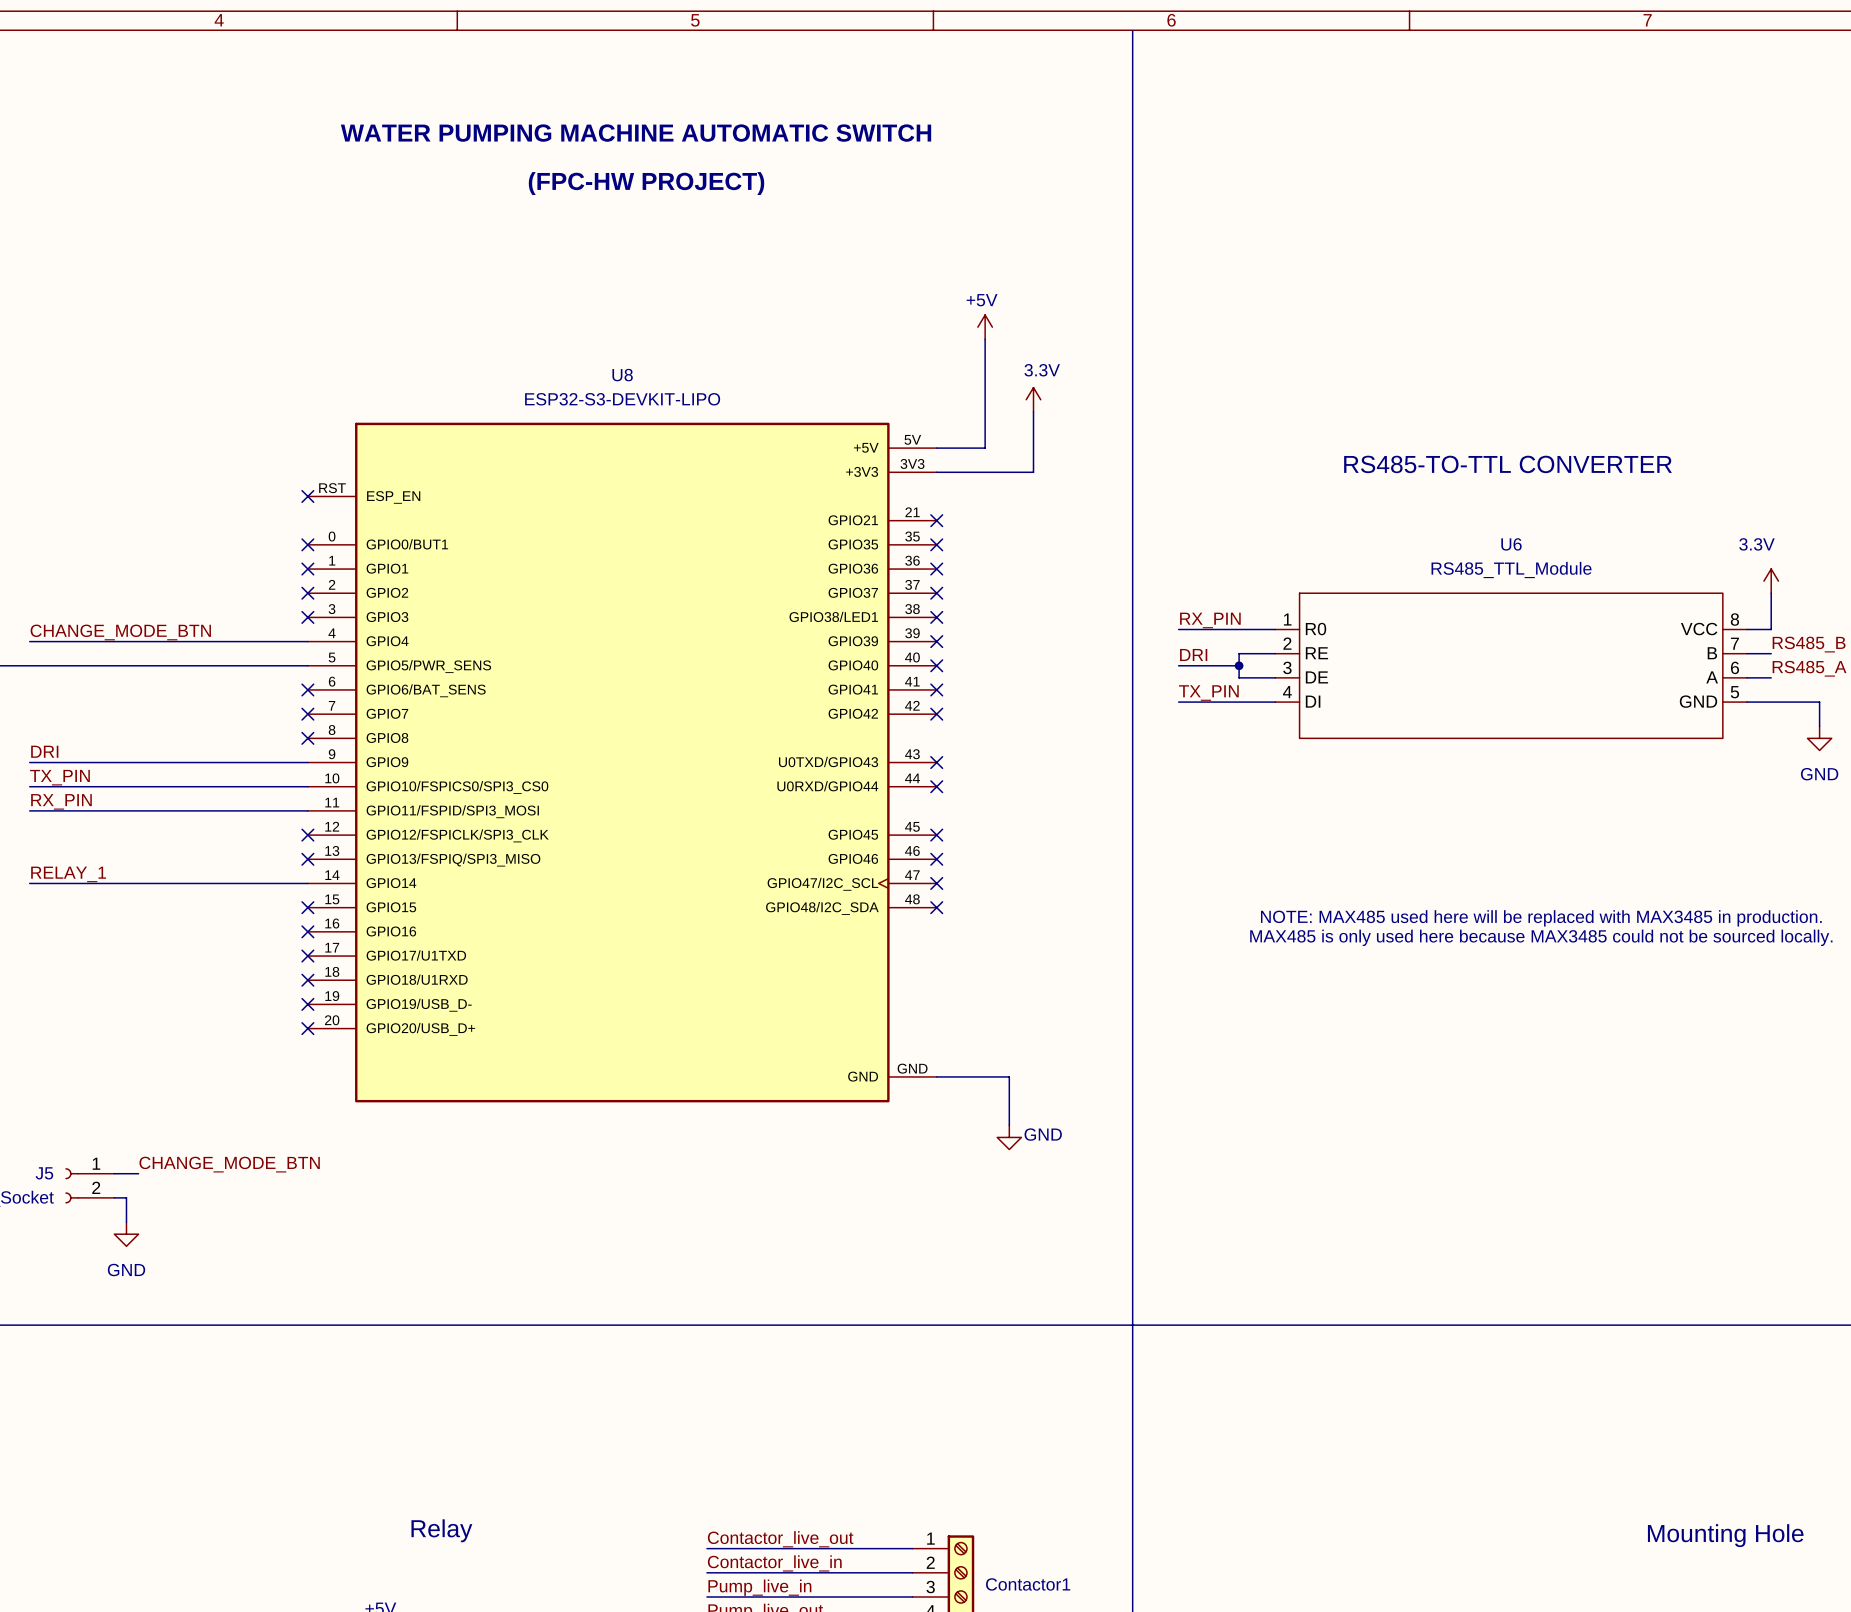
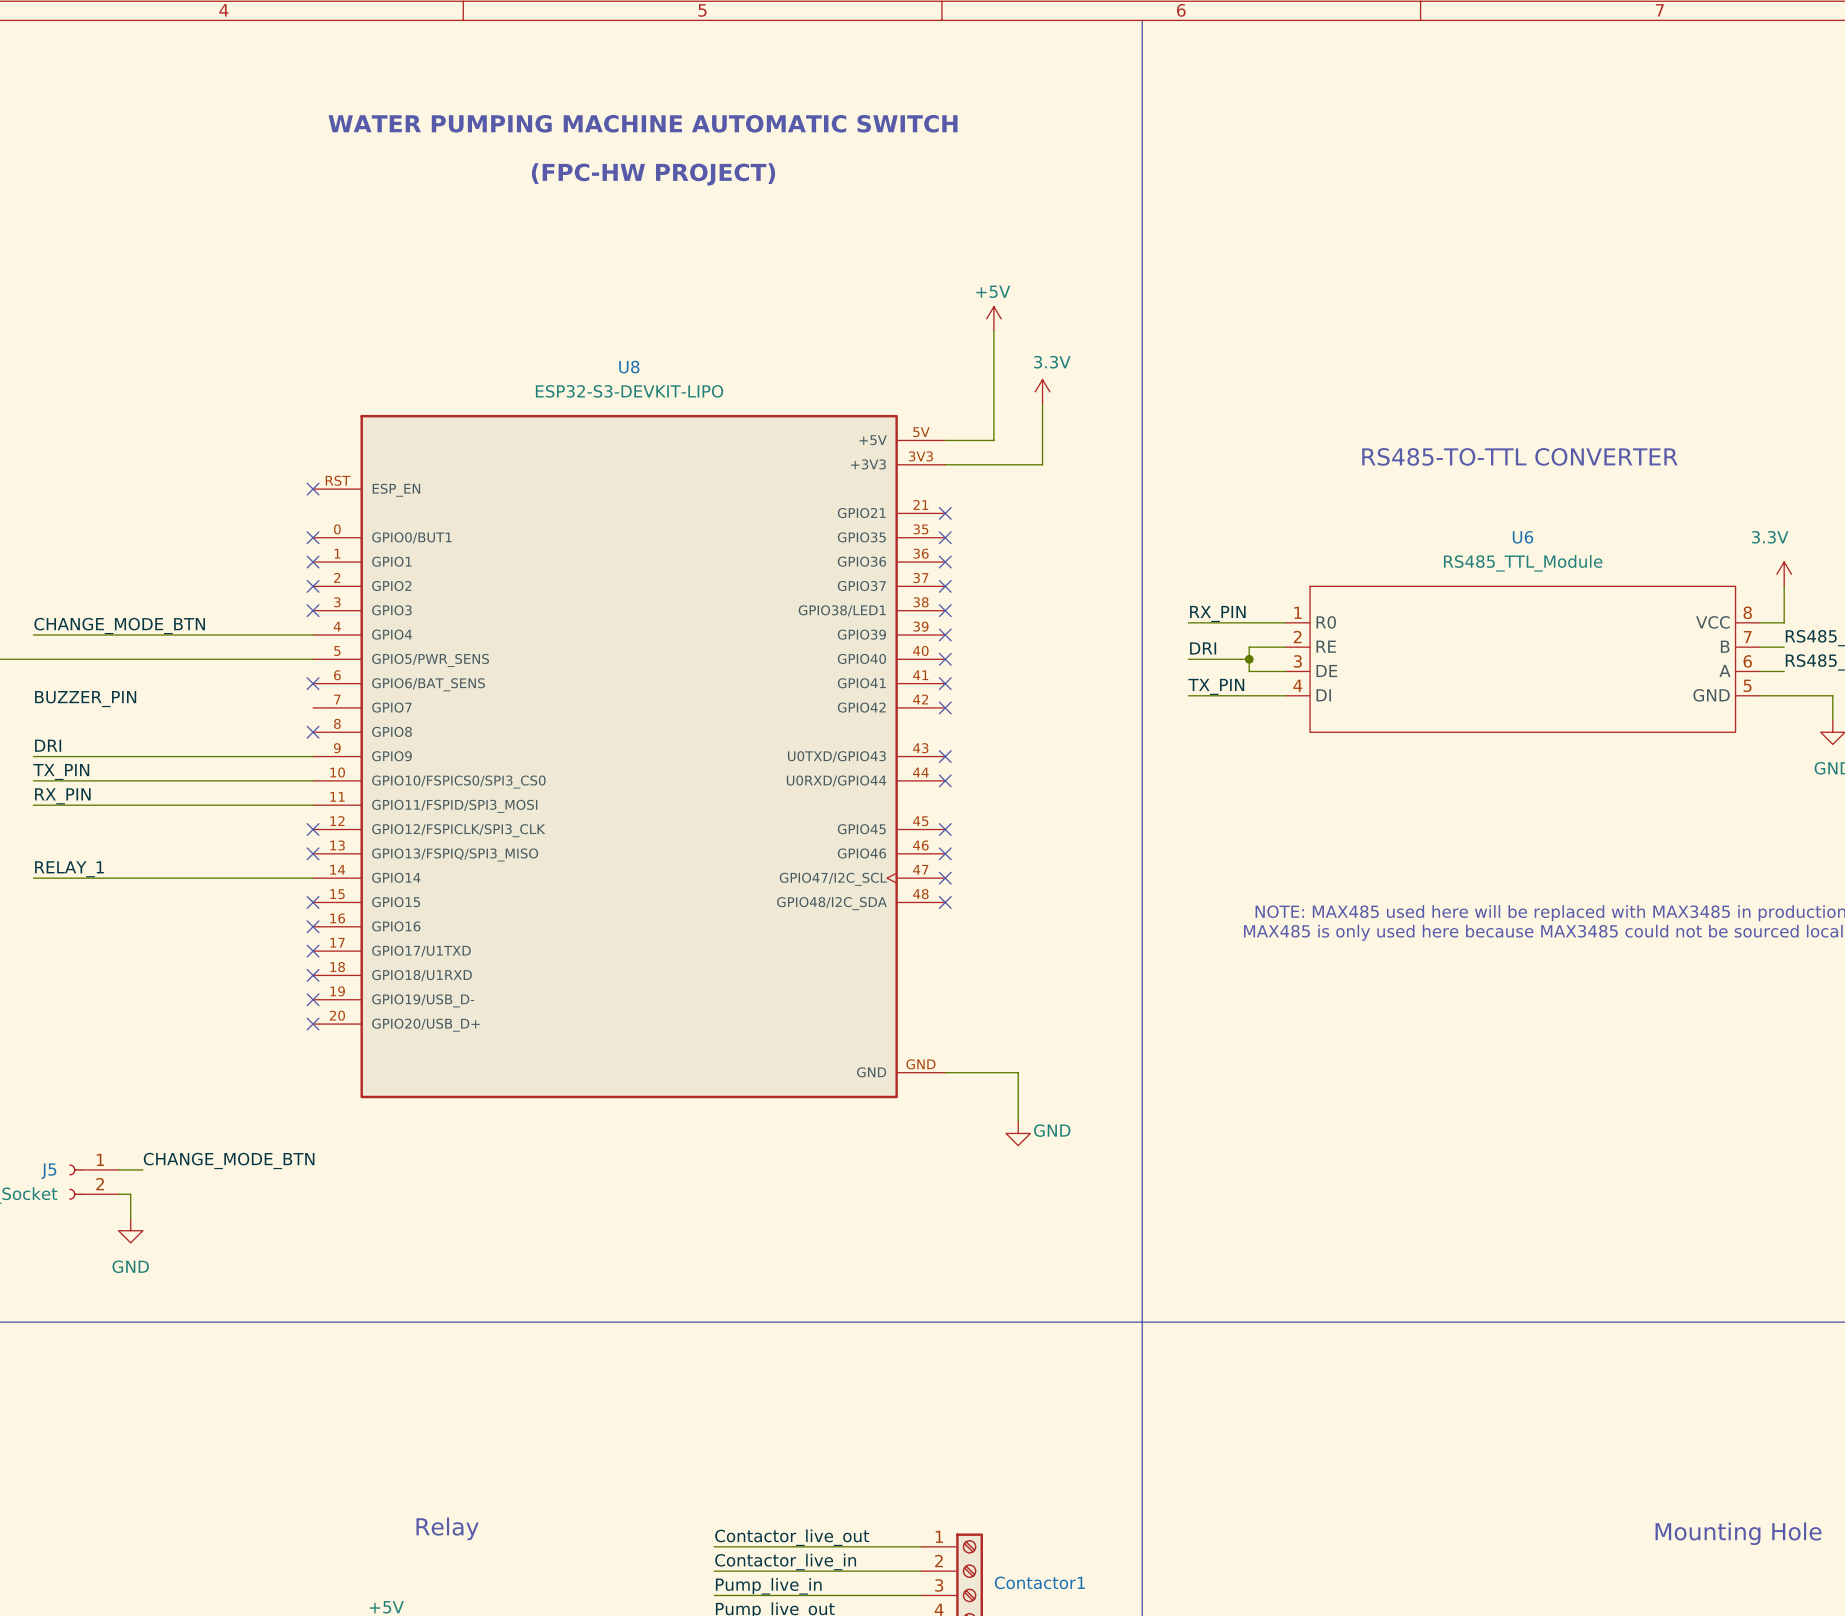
label: none -> BUZZER_PIN (85, 699)
no-connect mark: (307, 714) -> none

